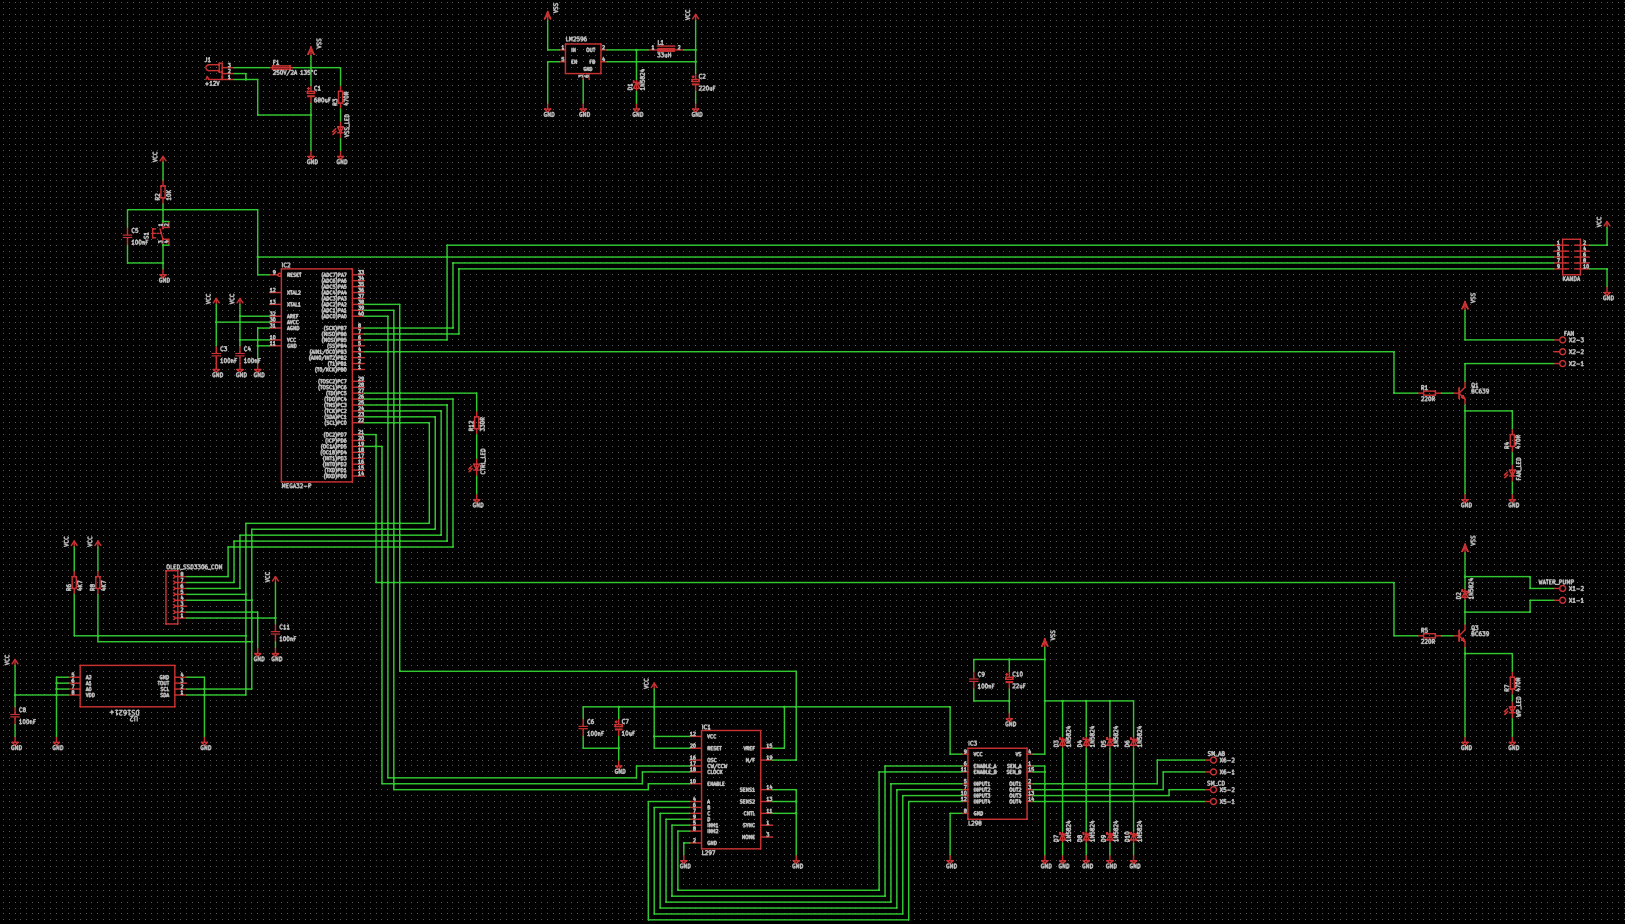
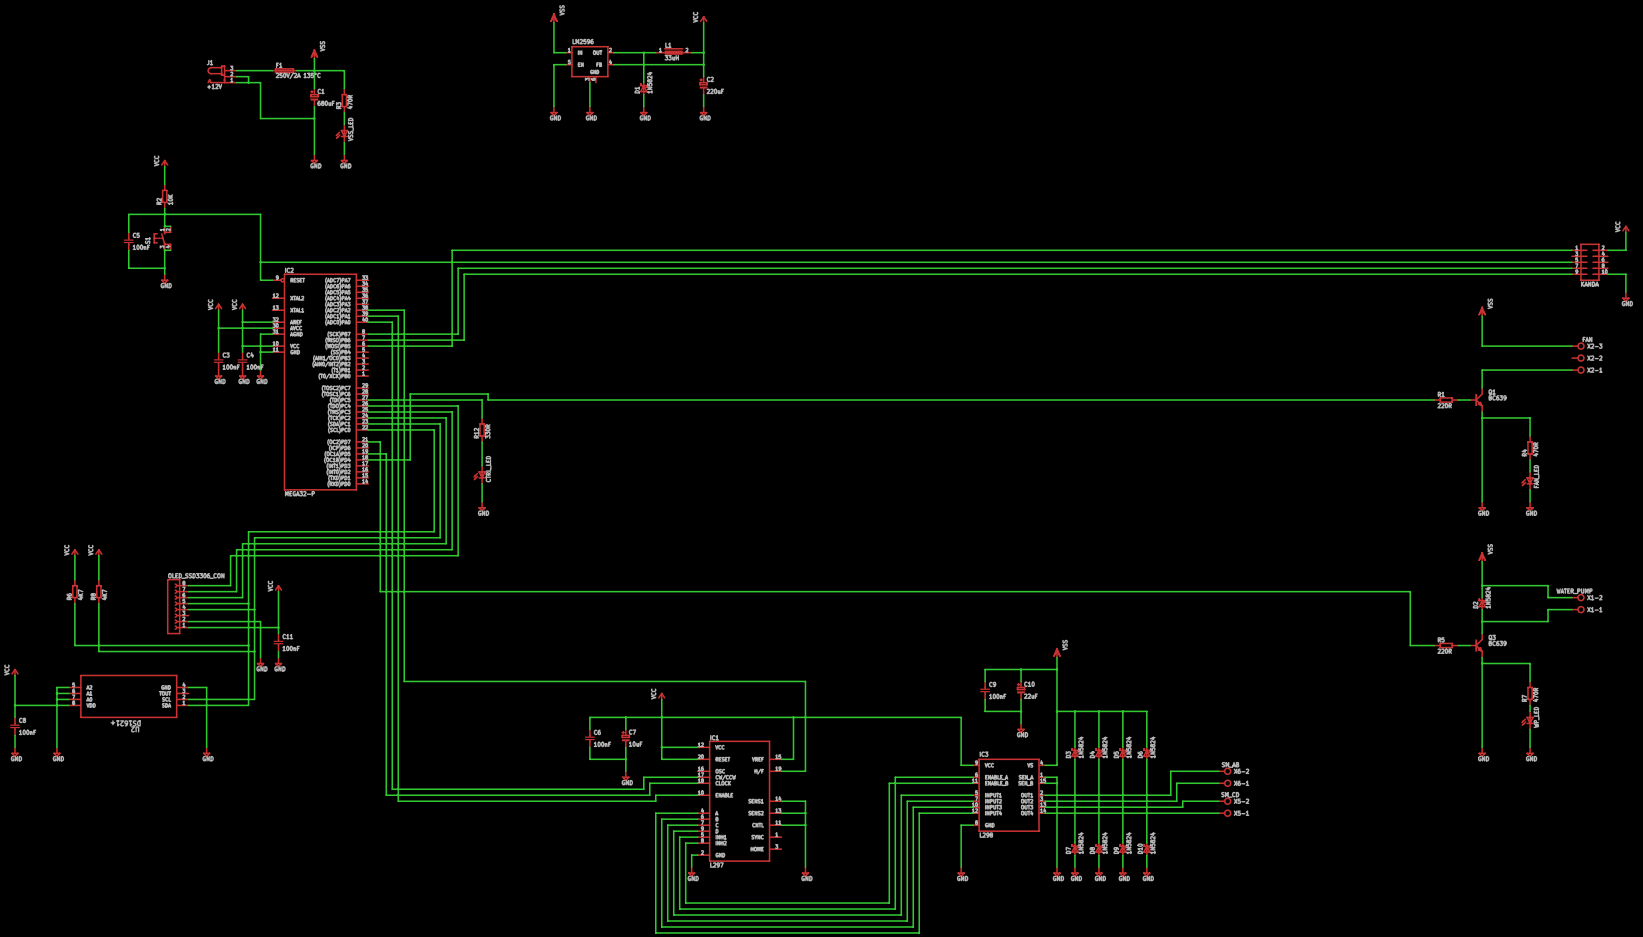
wire: (364, 351) (1393, 351) (1393, 393) -> (368, 459) (410, 459) (410, 394) (488, 394) (488, 400) (1410, 400)

